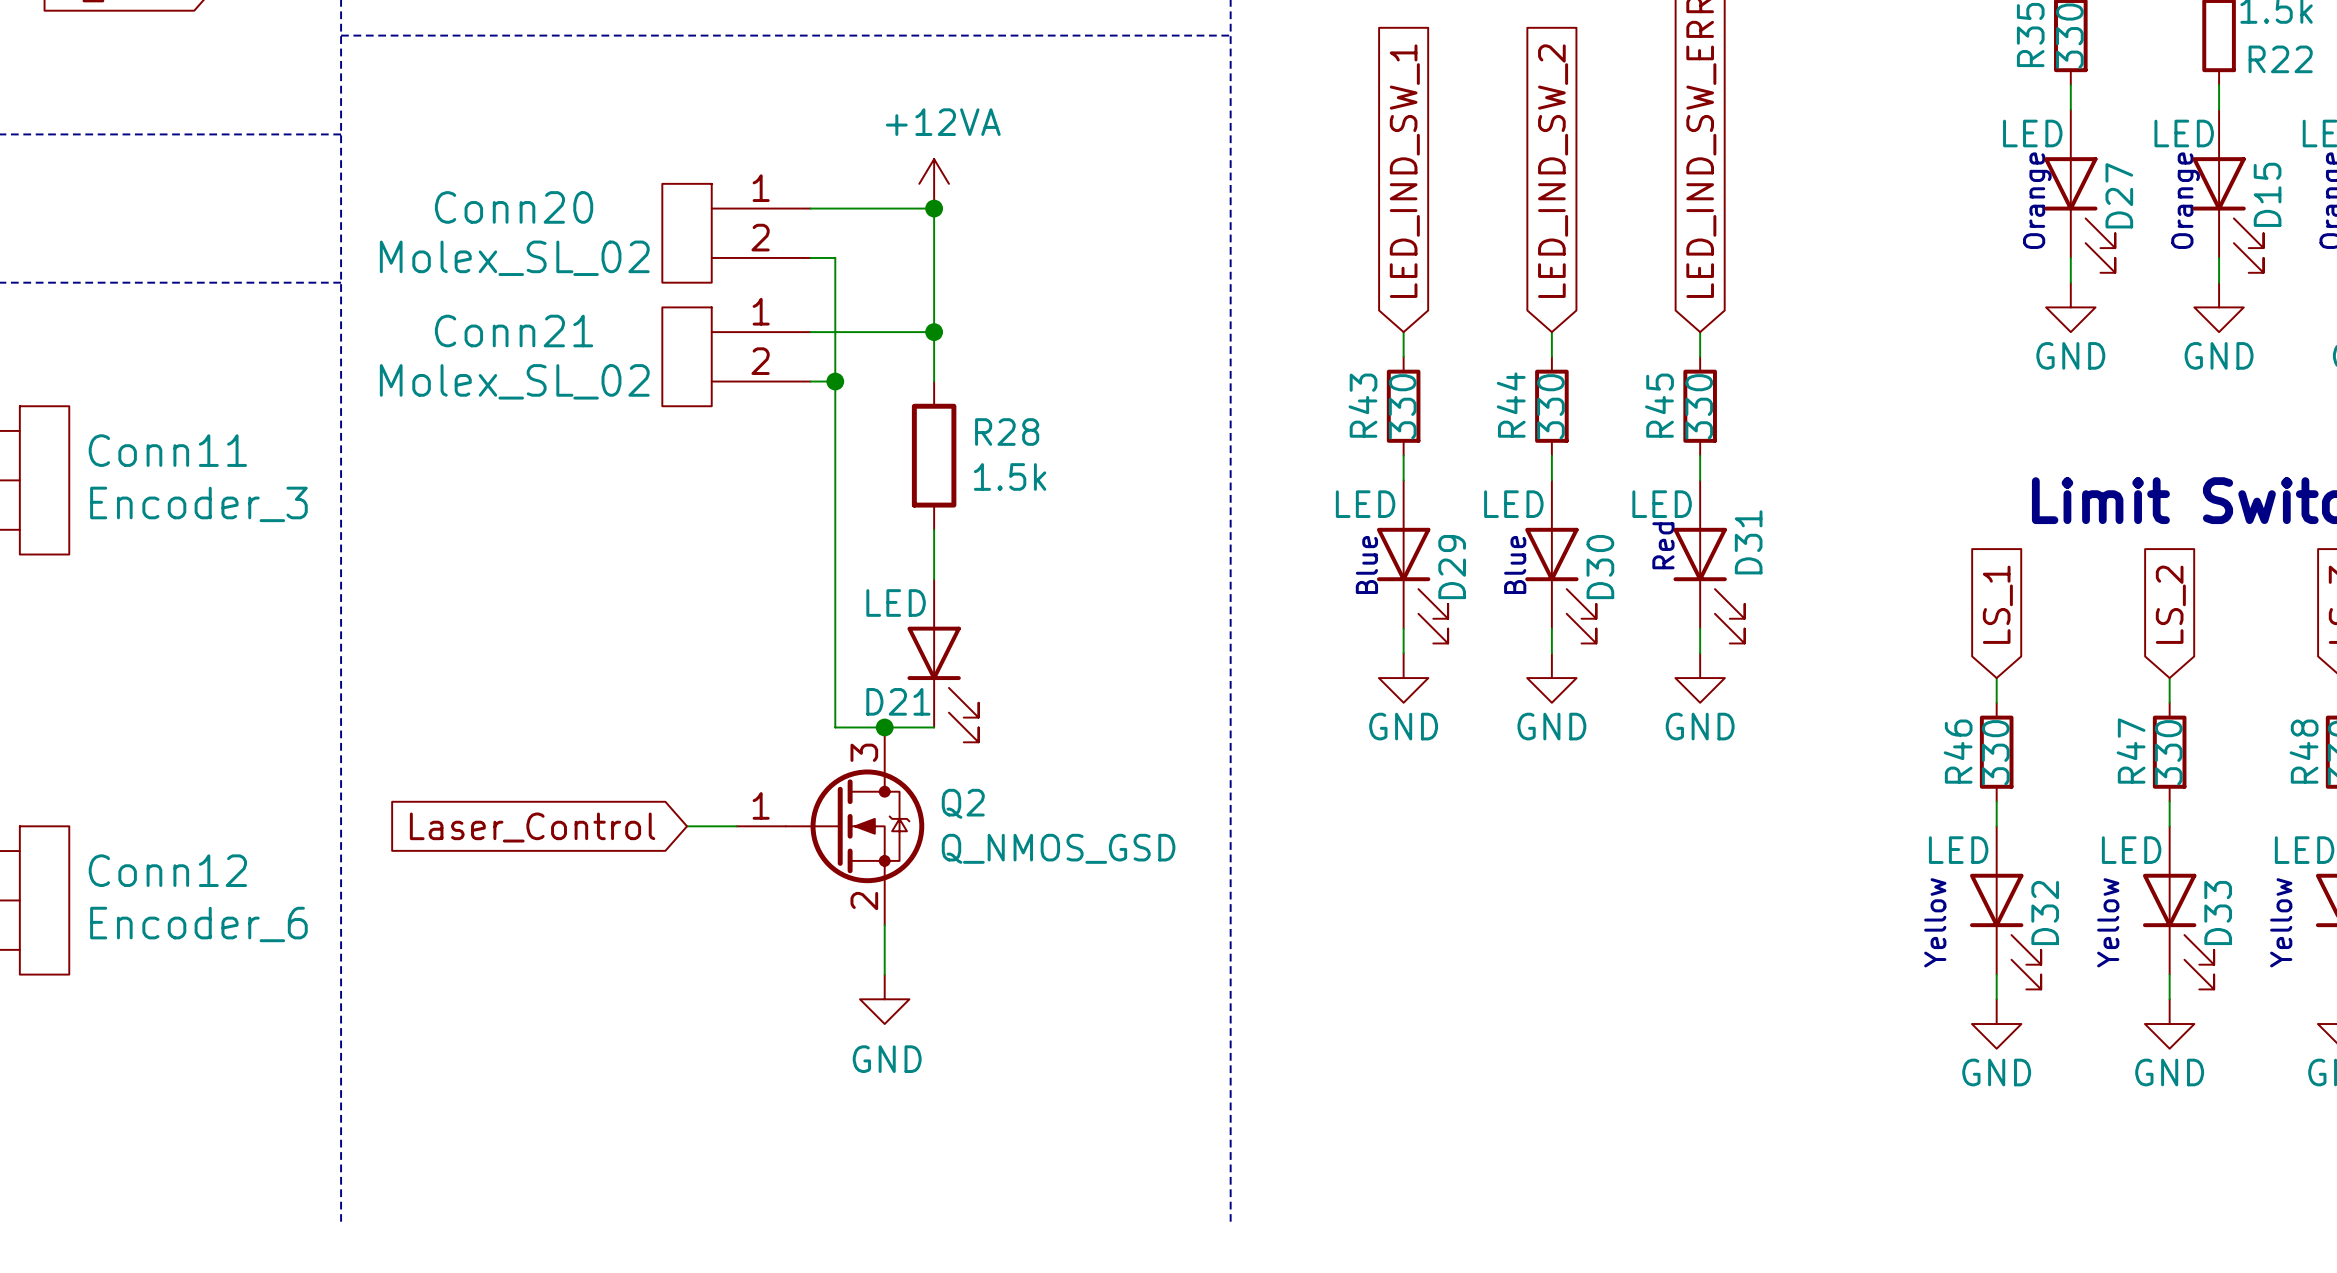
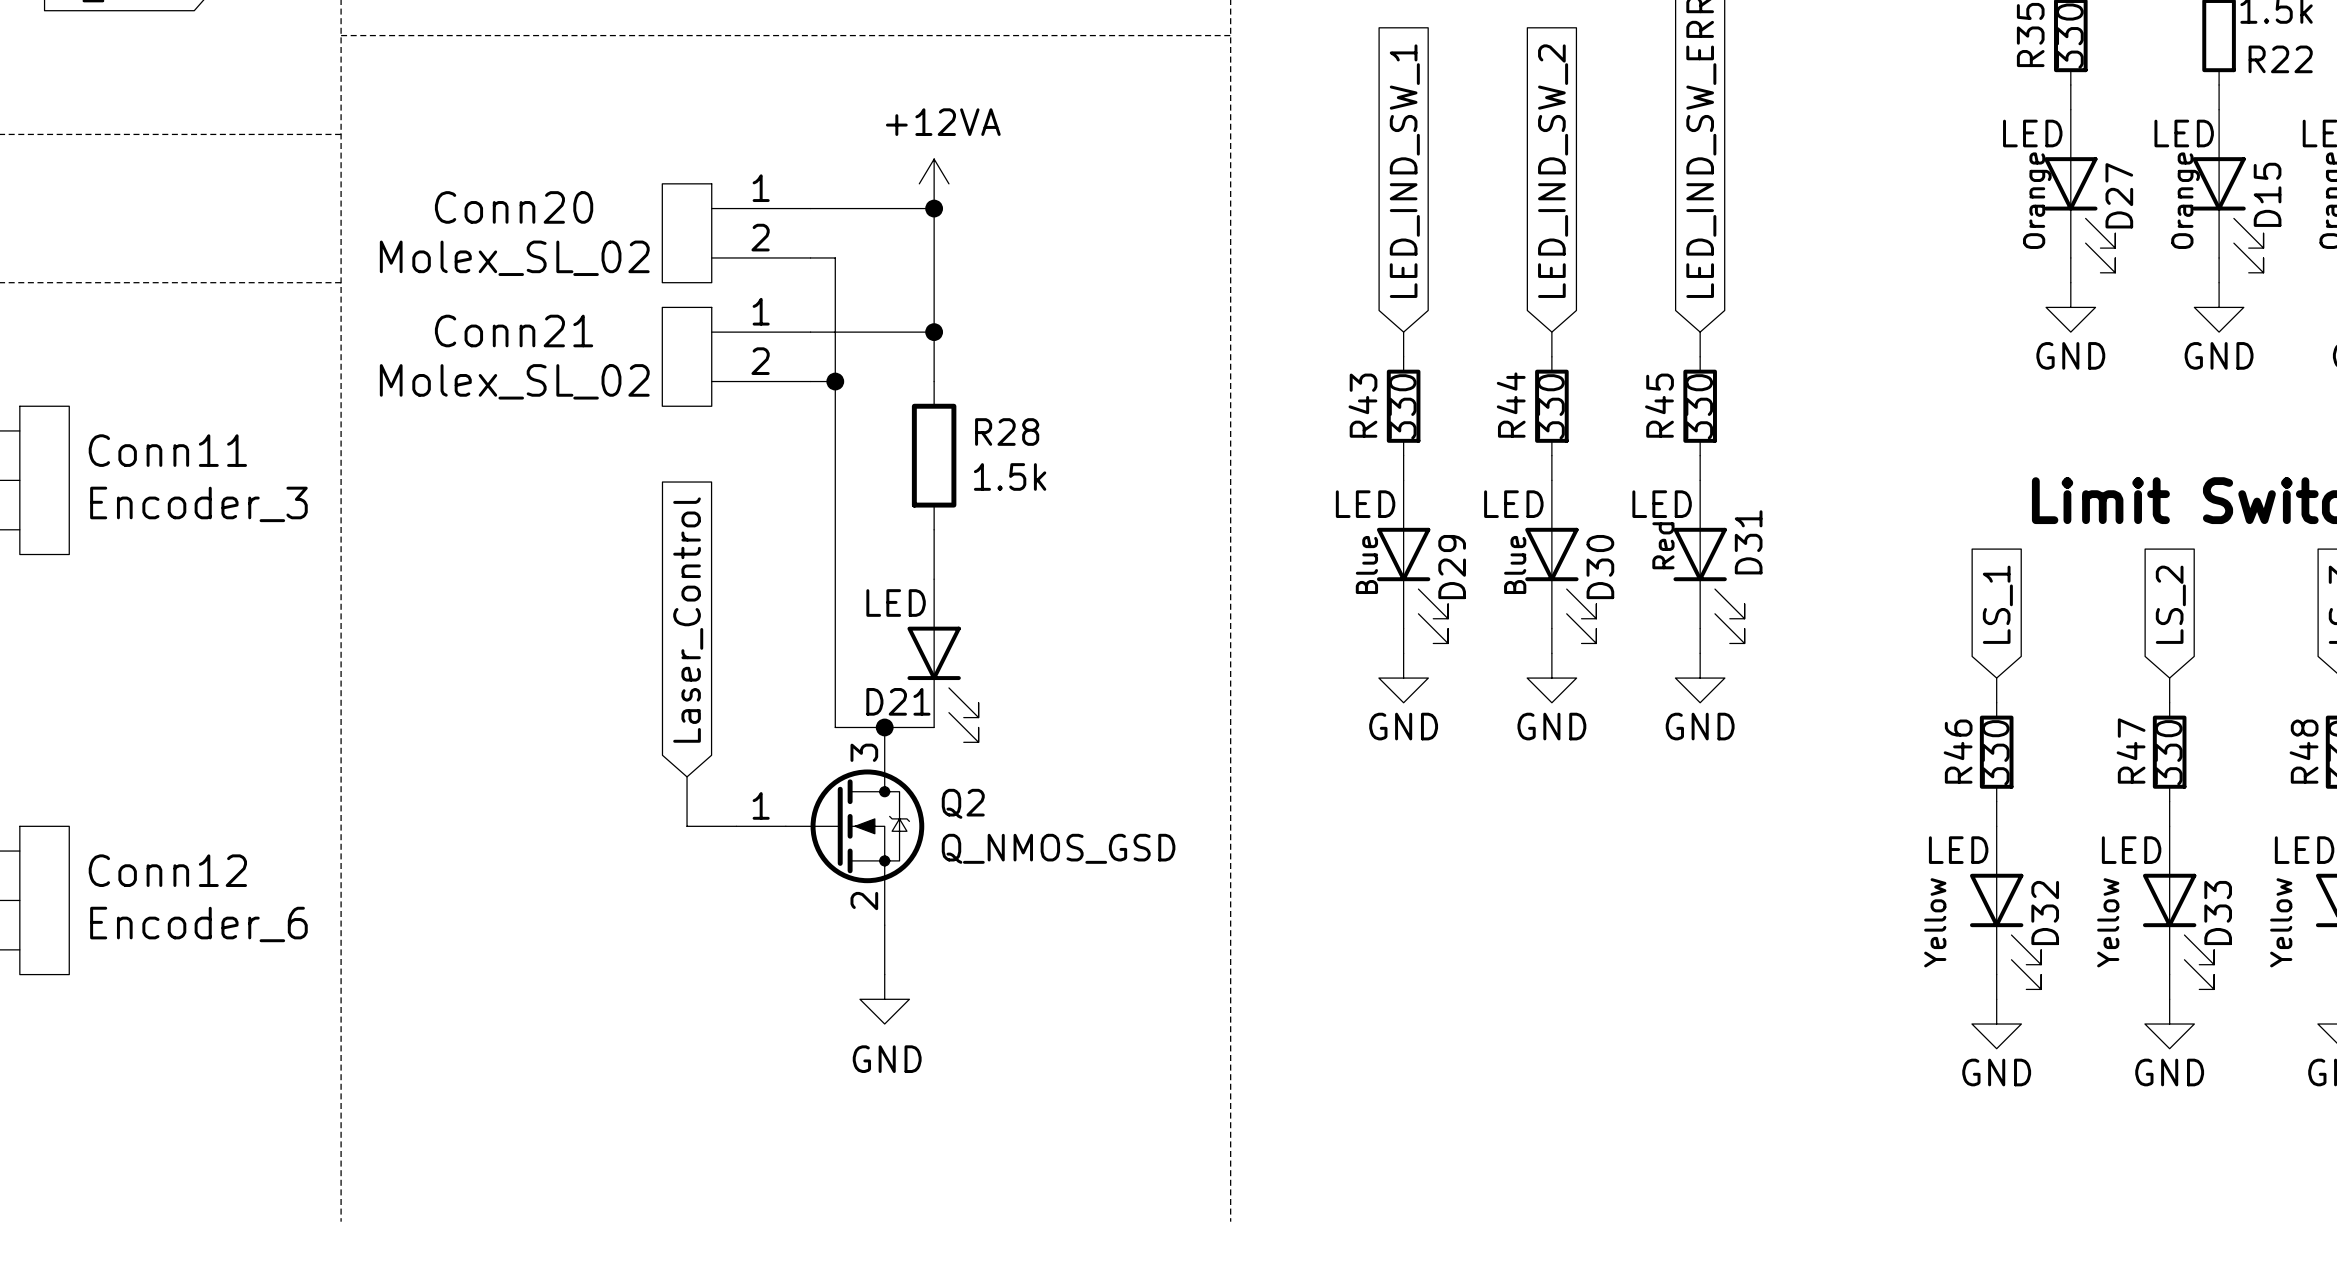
wire: none -> (687, 776) (687, 826)
global label rotation: 0° (532, 827) -> 90° clockwise (688, 620)

